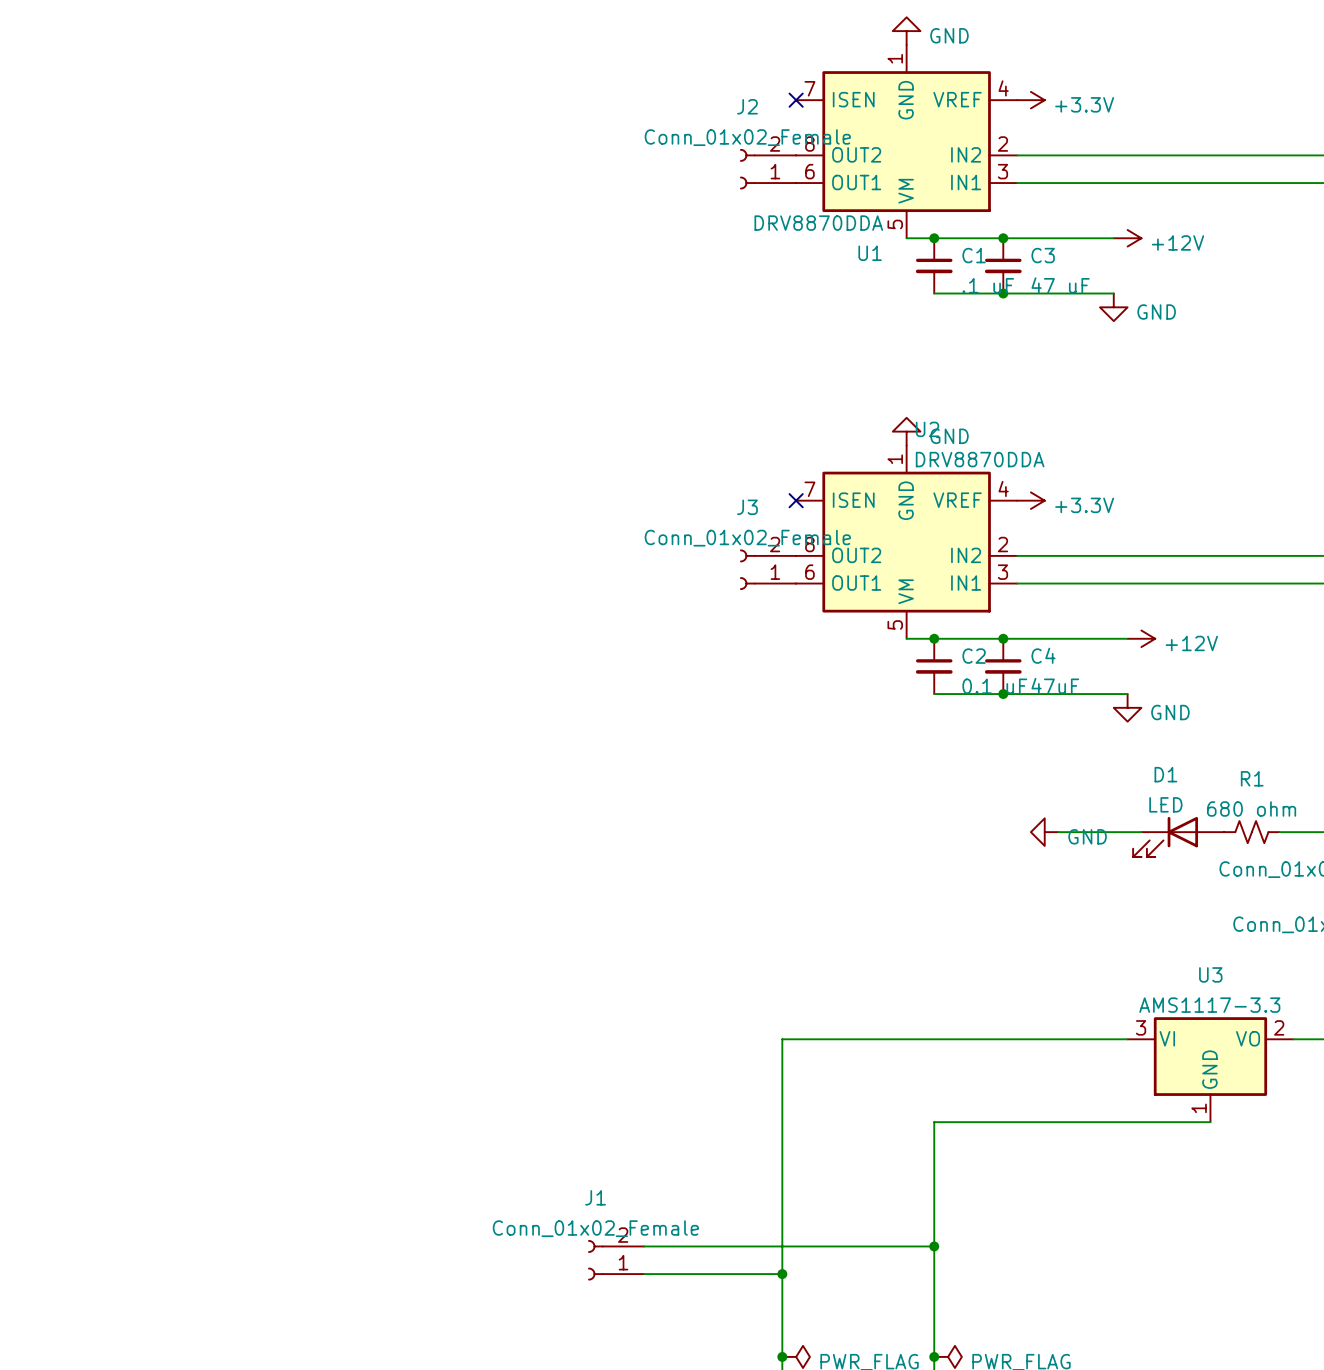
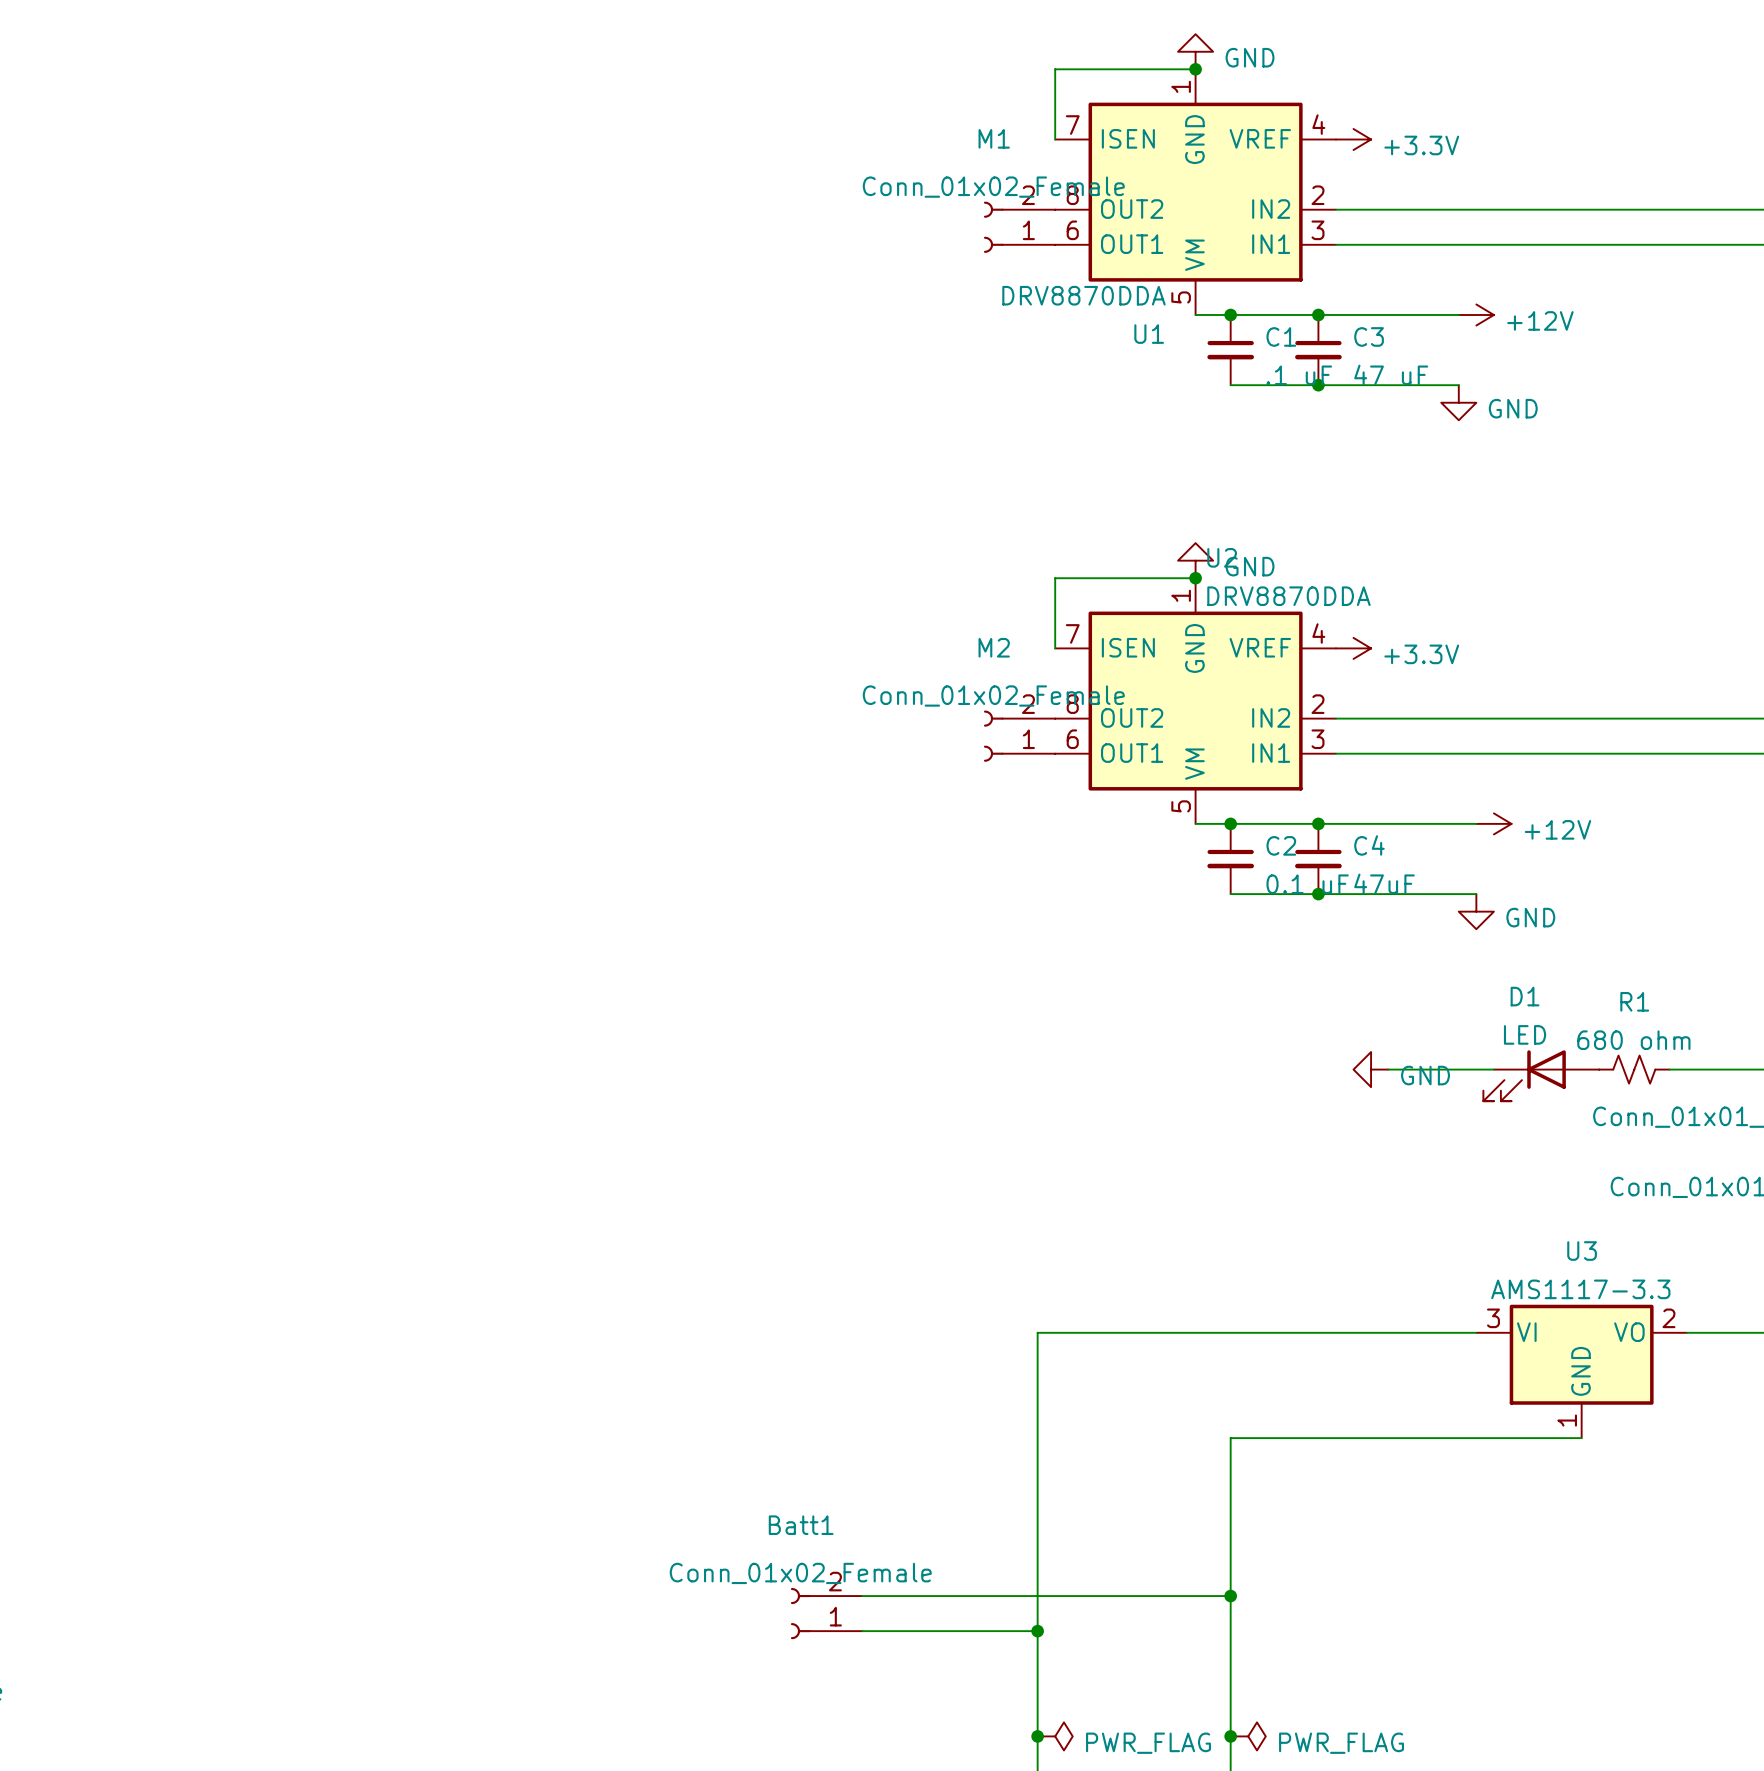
wire: none -> (1195, 69) (1055, 69) (1055, 139)
junction: none -> (1195, 69)
no-connect mark: (796, 100) -> none
J2 name: J2 (747, 106) -> M1 (994, 138)
wire: none -> (1195, 578) (1055, 578) (1055, 648)
junction: none -> (1195, 578)
no-connect mark: (796, 500) -> none
J3 name: J3 (747, 507) -> M2 (994, 647)
J1 name: J1 (595, 1197) -> Batt1 (801, 1525)

